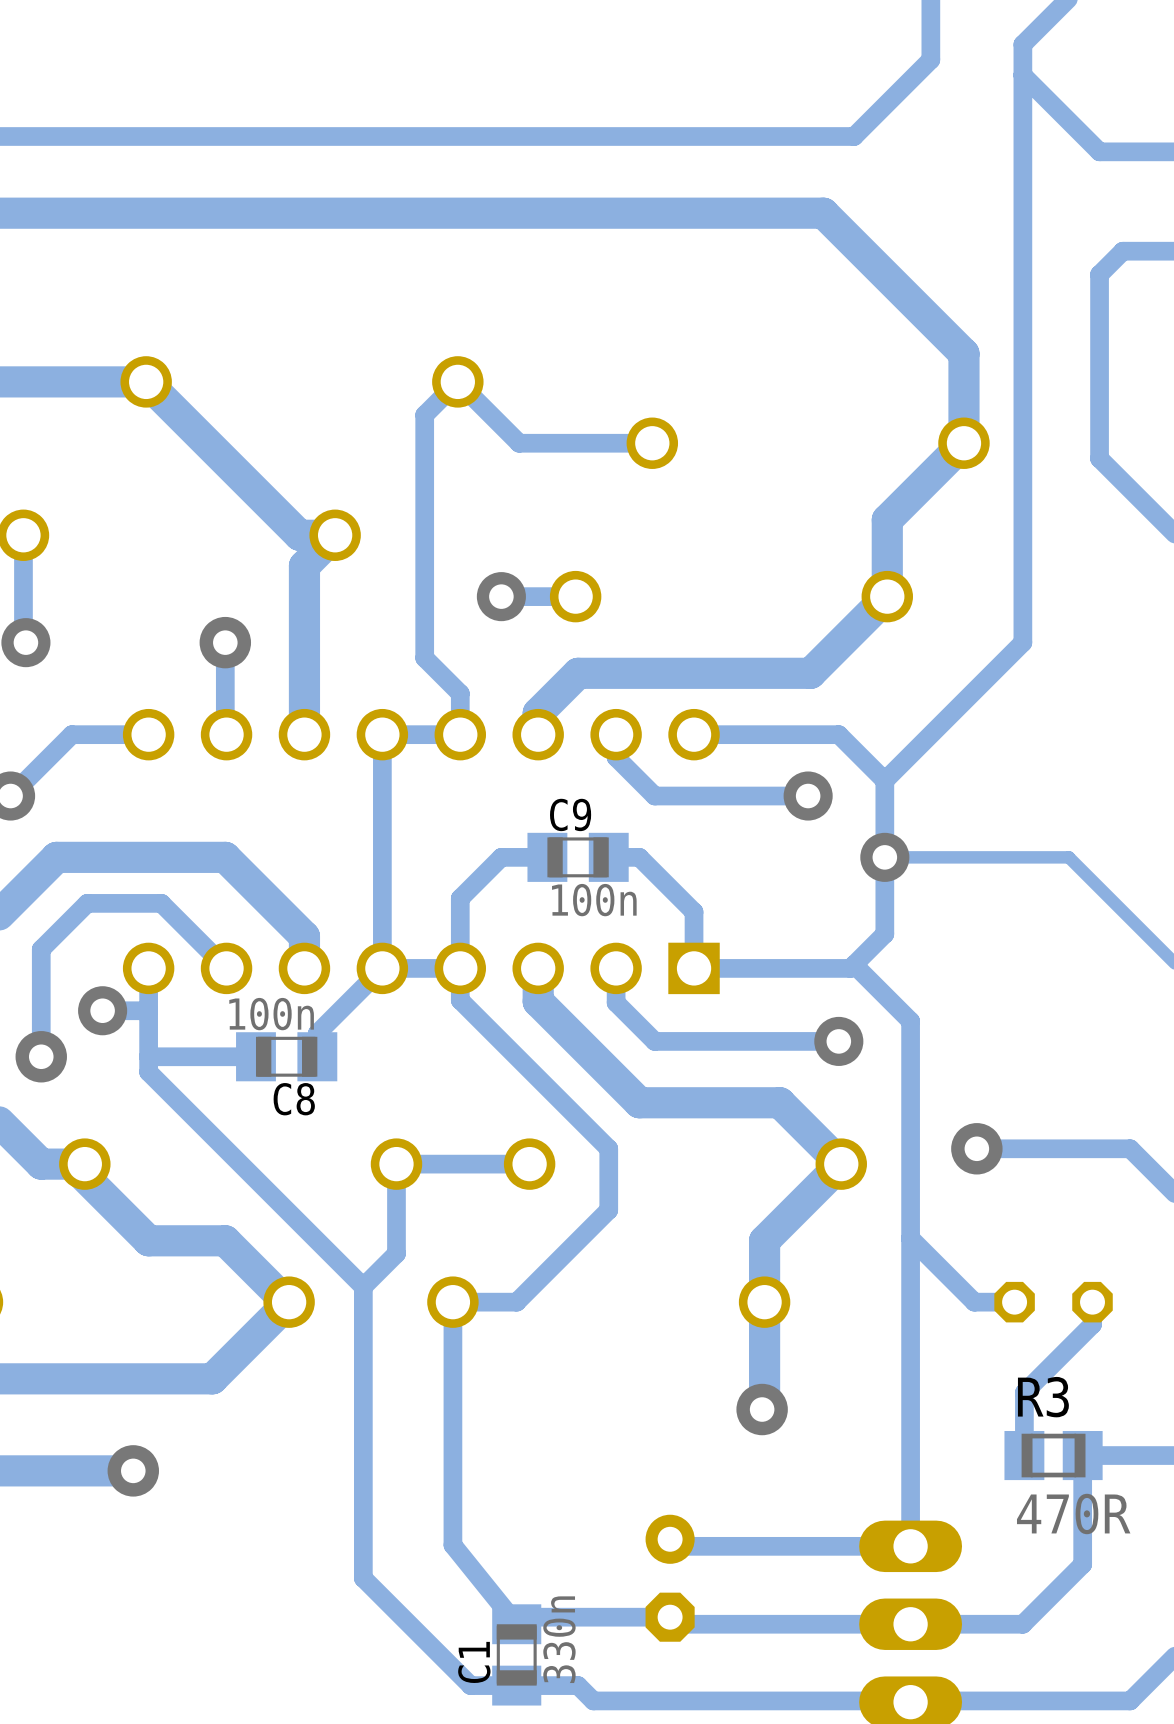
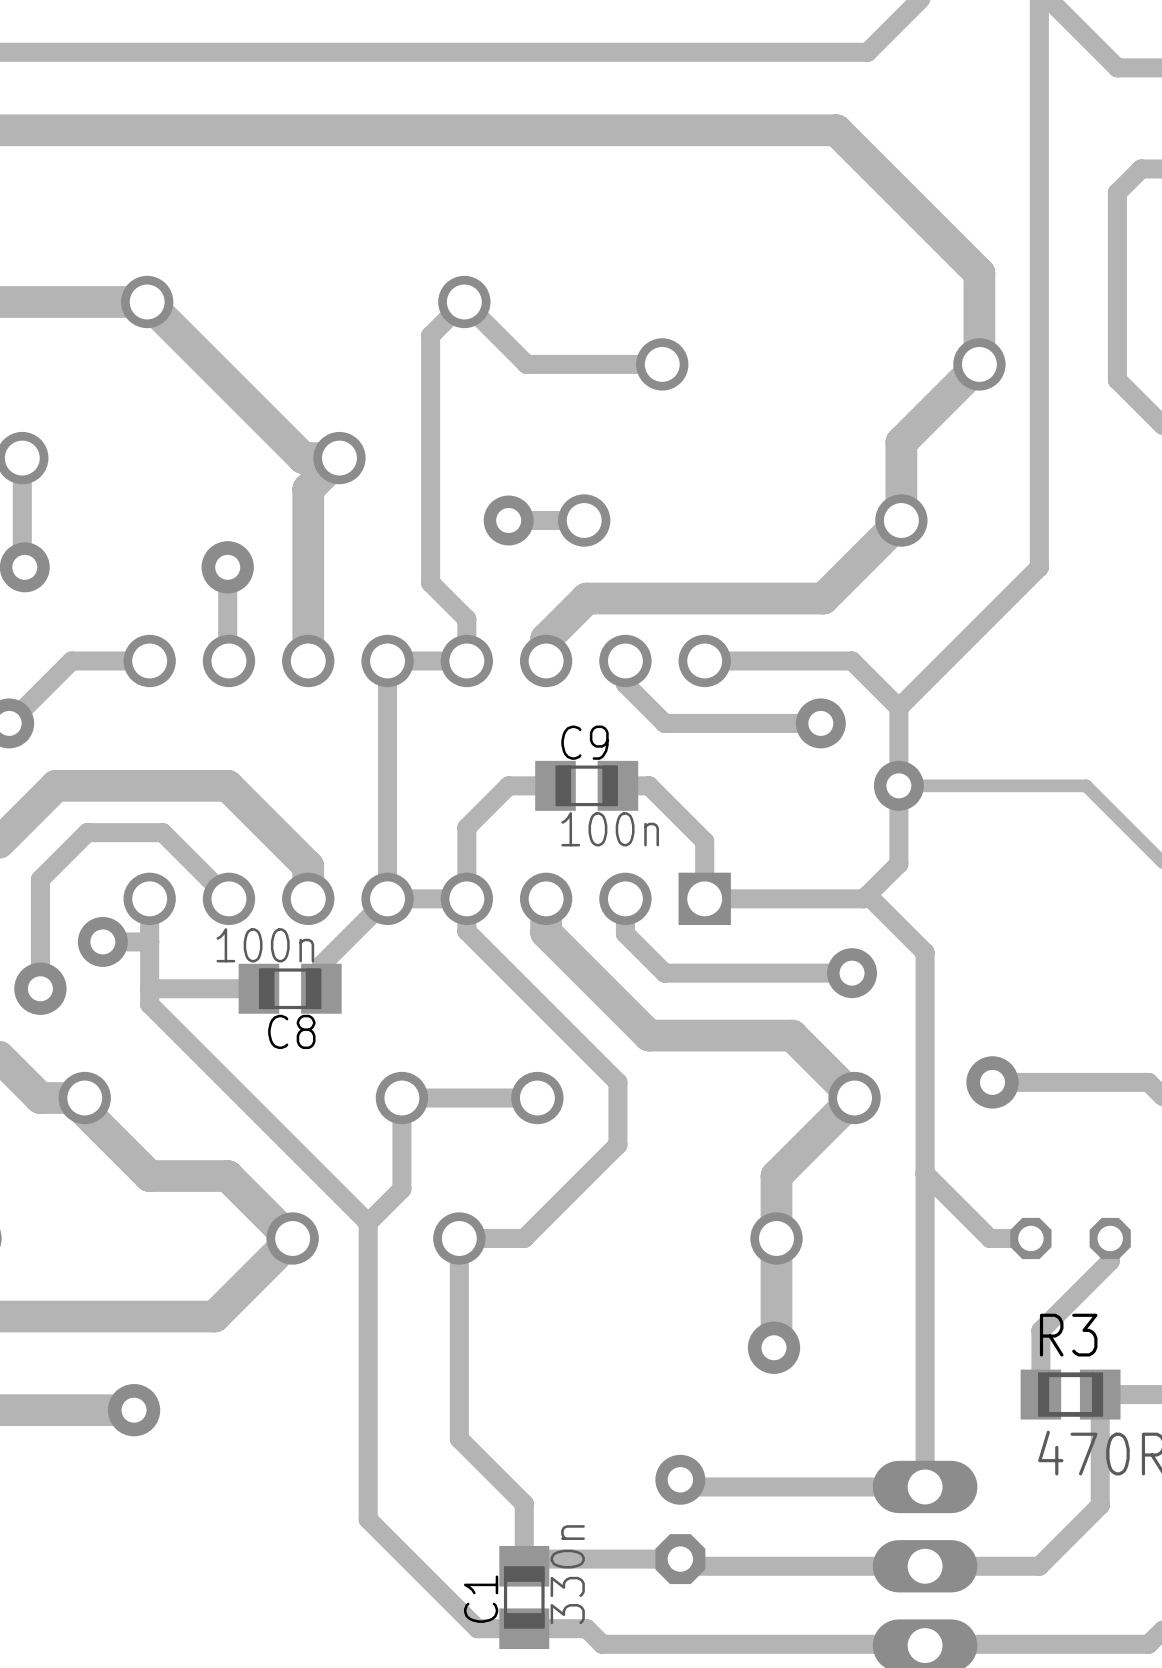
track: (452, 1499) (452, 1545) (516, 1624) (525, 1617) -> (459, 1438) (524, 1503) (524, 1566)

